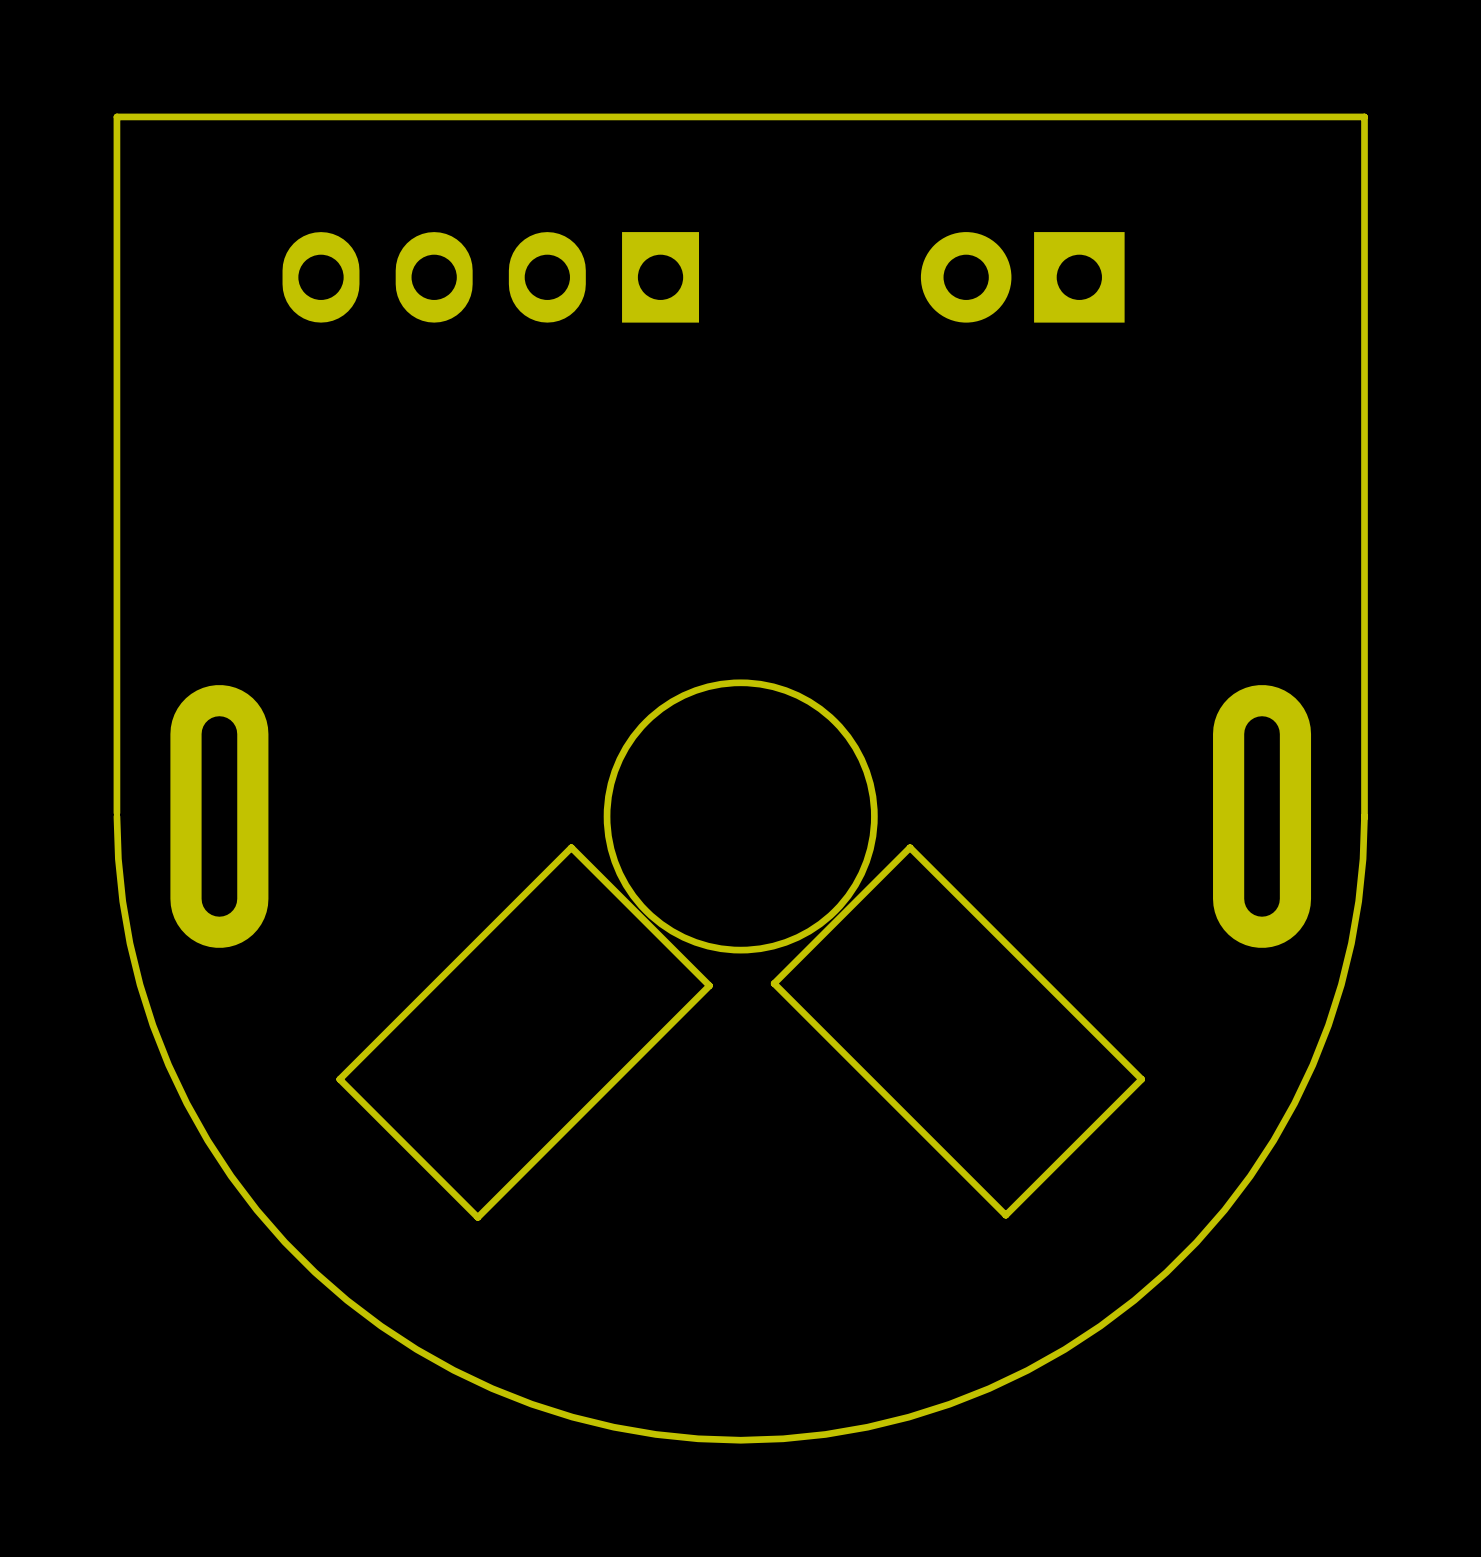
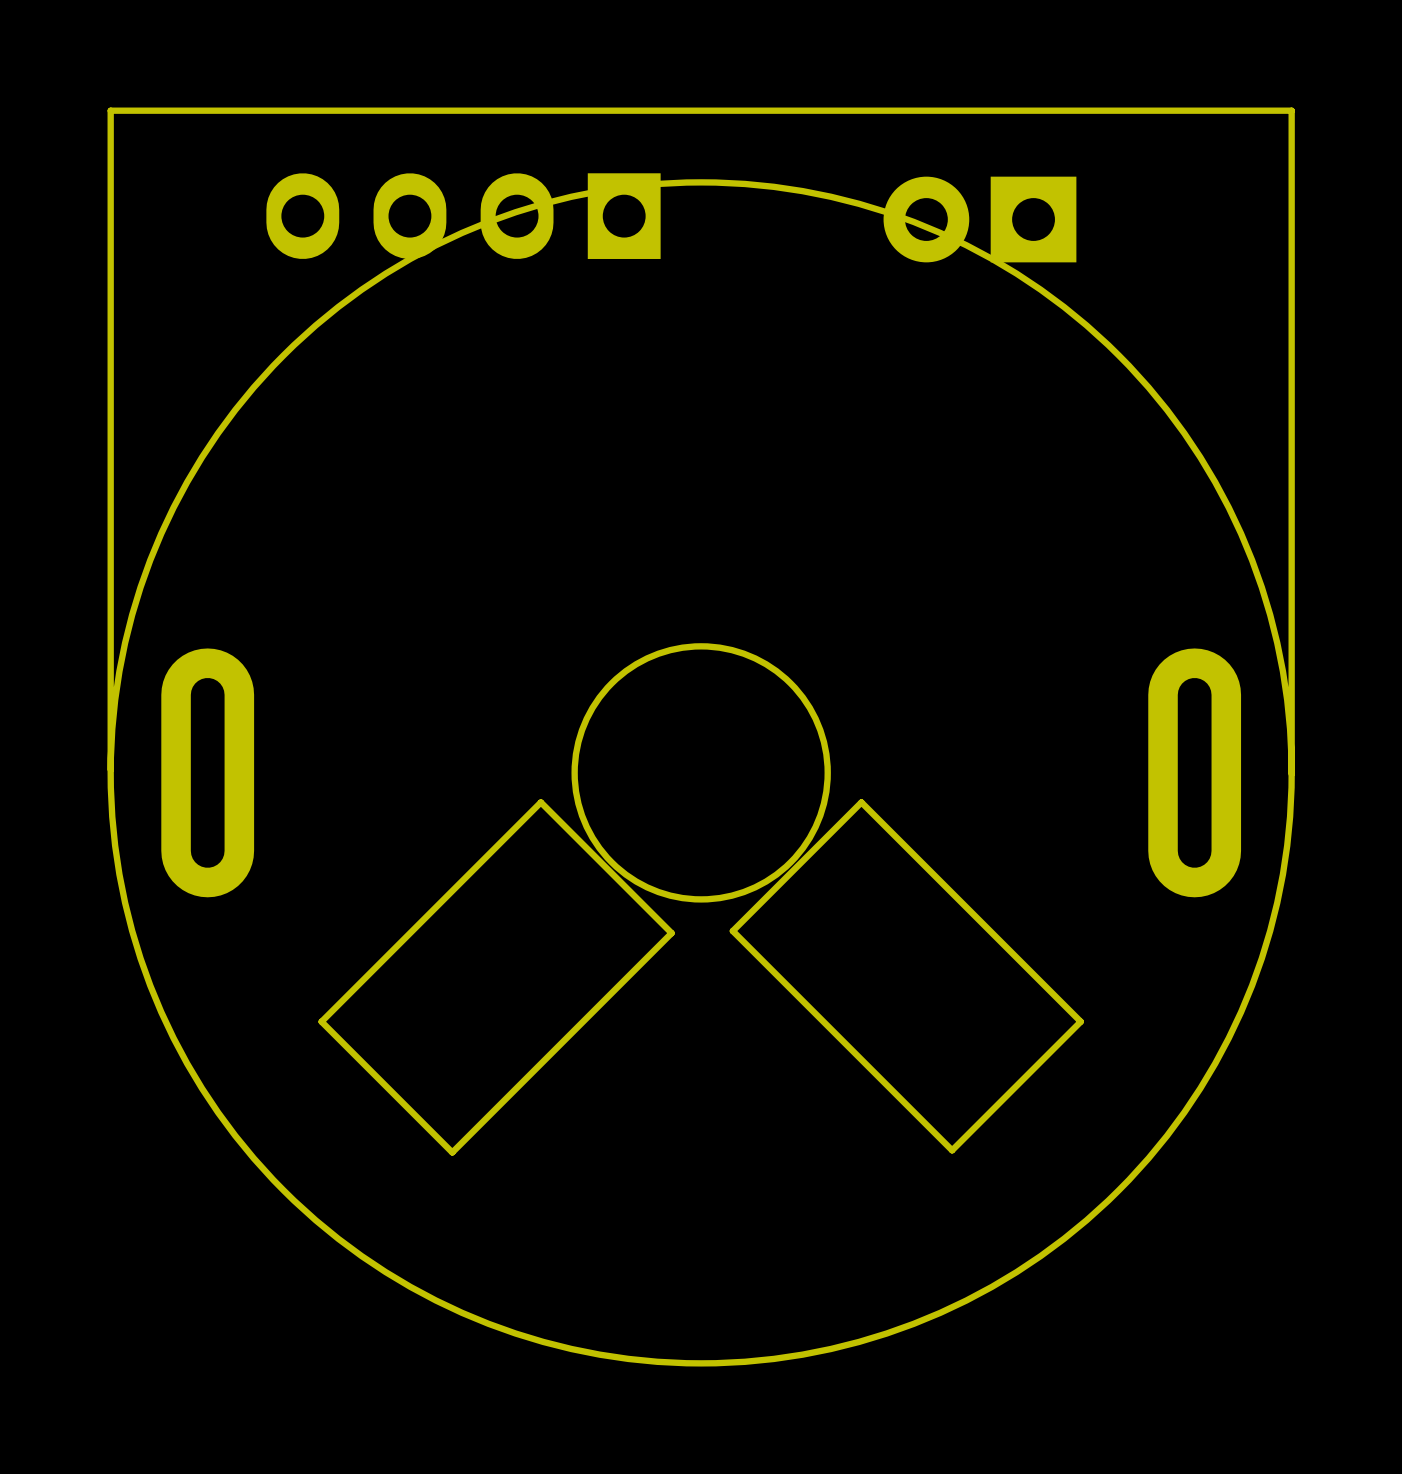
round board edge: none -> [107, 179, 1295, 1367]
part position: (490, 277) -> (463, 216)
part position: (1022, 277) -> (979, 219)
board edge: (1364, 816) (1363, 859) (1351, 943) (1341, 984) (1312, 1064) (1273, 1140) (1224, 1210) (1196, 1242) (1134, 1300) (1100, 1326) (1064, 1349) (989, 1388) (949, 1404) (867, 1427) (783, 1438) (740, 1440) (698, 1438) (613, 1427) (531, 1404) (492, 1388) (453, 1370) (380, 1326) (347, 1300) (284, 1242) (231, 1176) (207, 1140) (168, 1064) (140, 984) (129, 943) (118, 859) (116, 816) -> none

